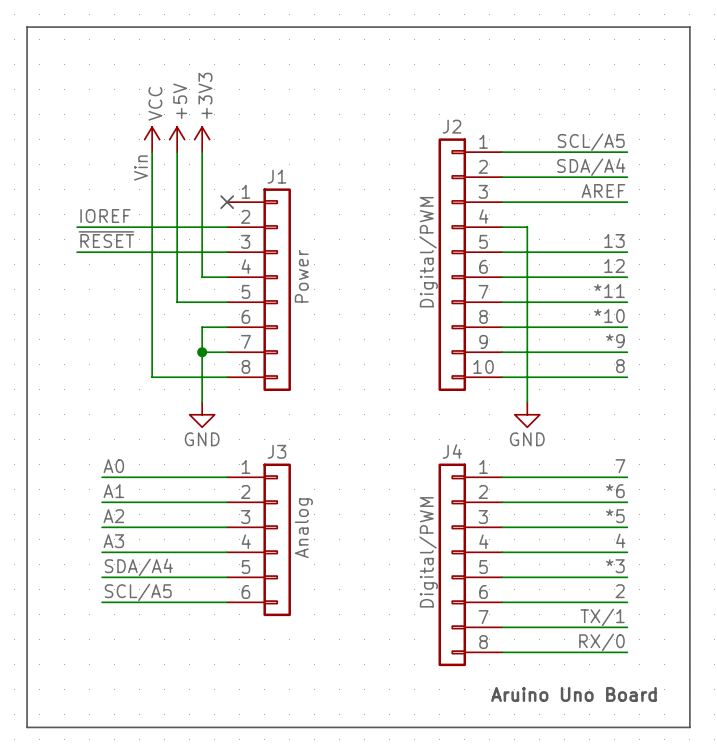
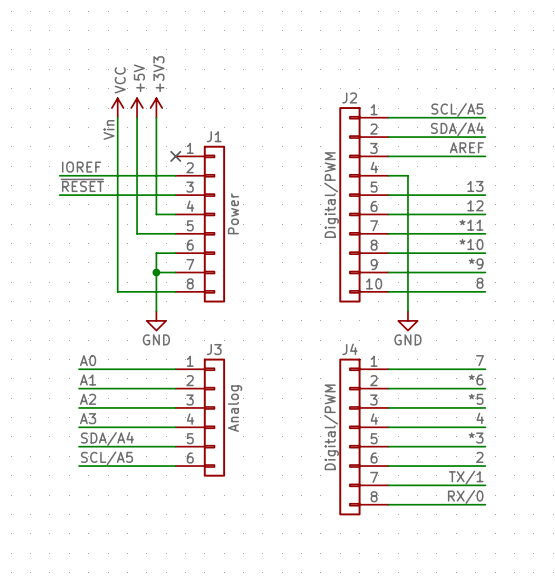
line: (27, 27) (689, 27) (689, 727) (27, 727) (27, 27) -> none
text: Aruino Uno Board (573, 694) -> none

